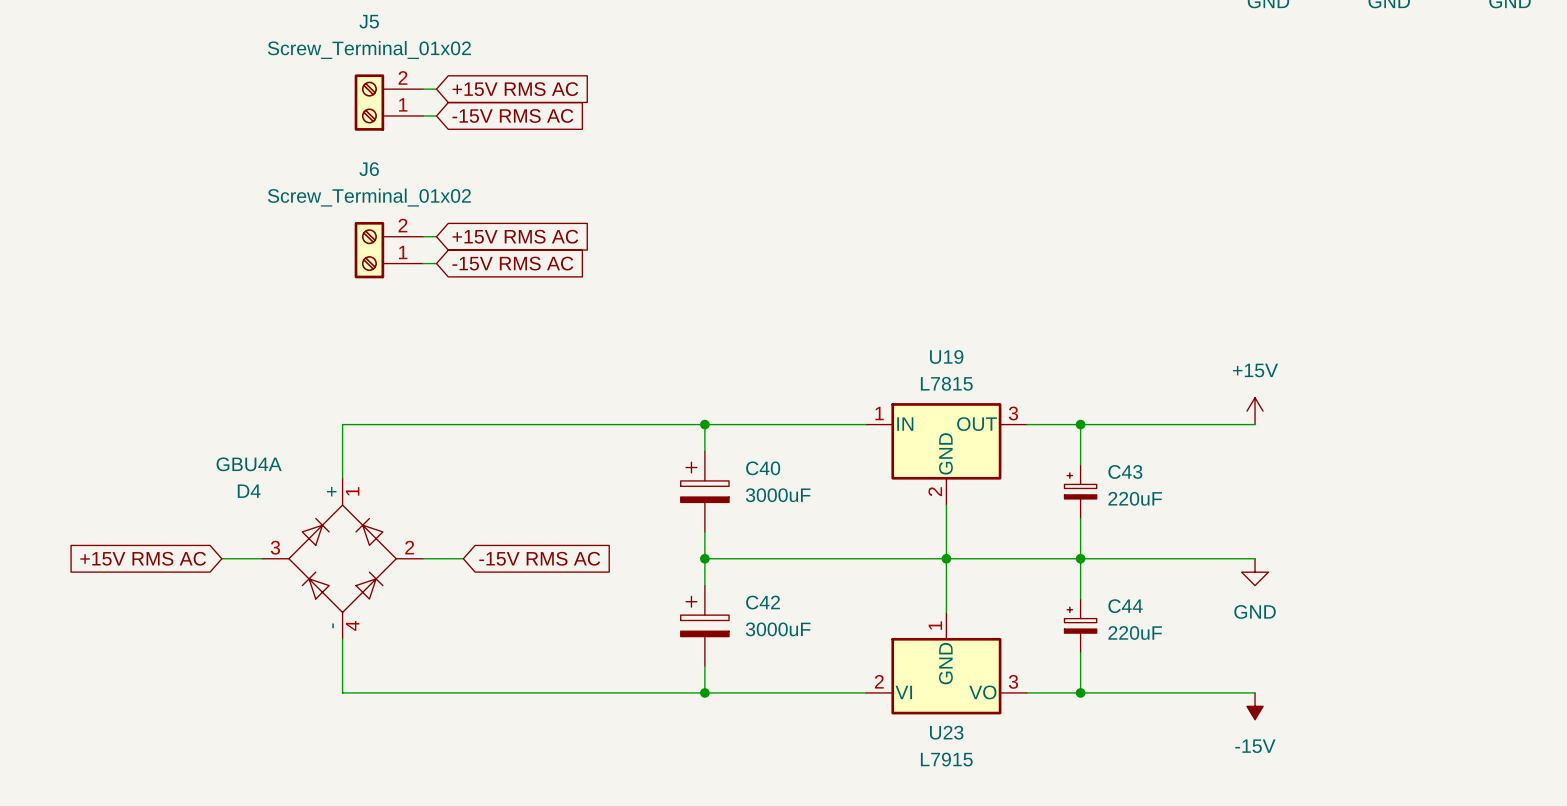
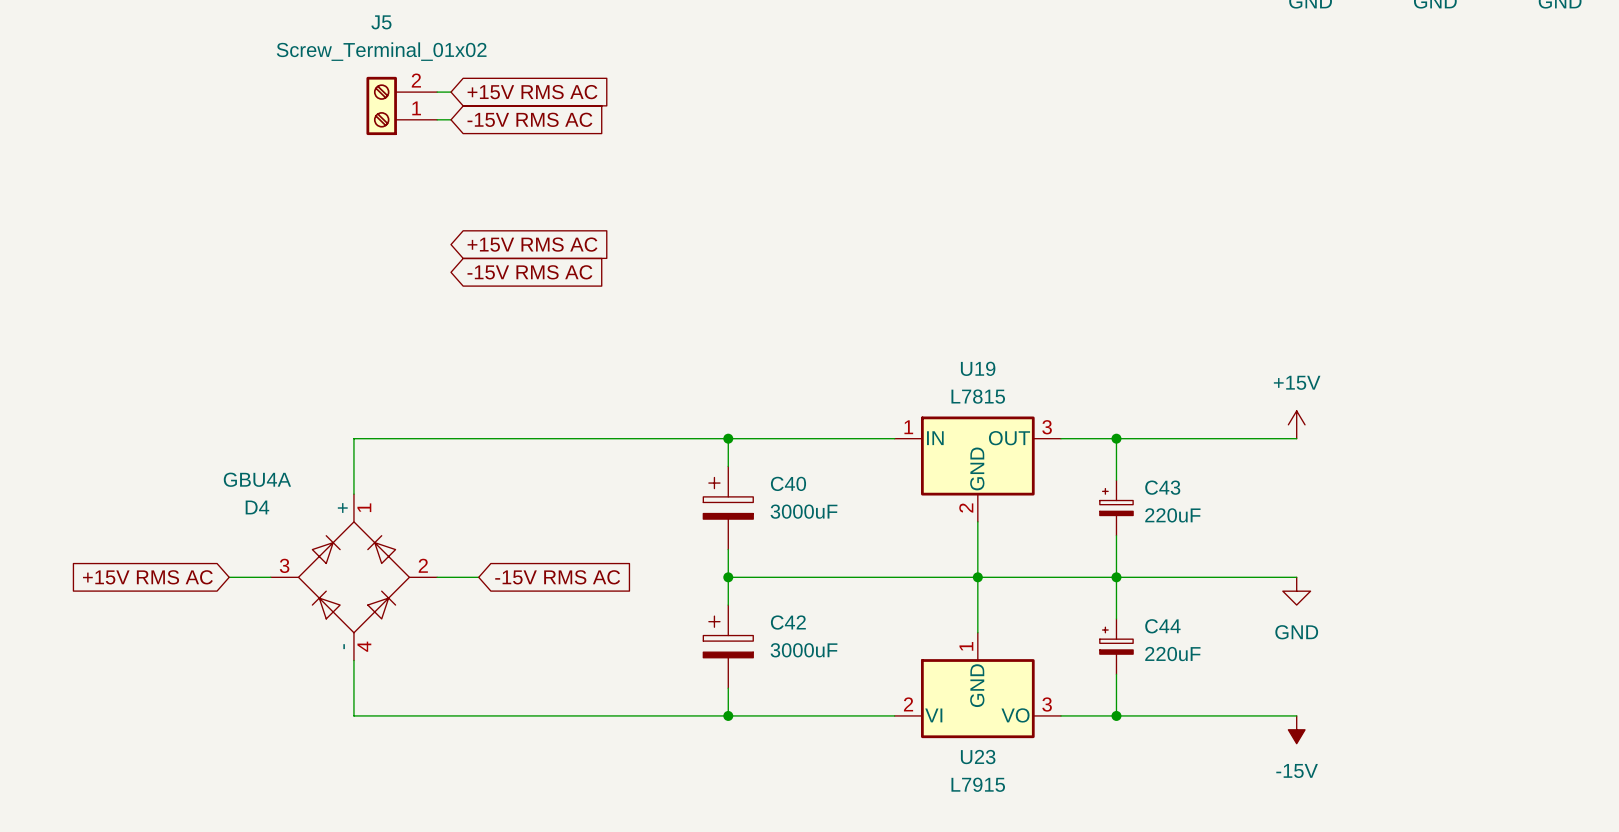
wire: (423, 236) (436, 236) -> none
J6: Screw_Terminal_01x02 (388, 250) -> none
wire: (423, 263) (436, 263) -> none

